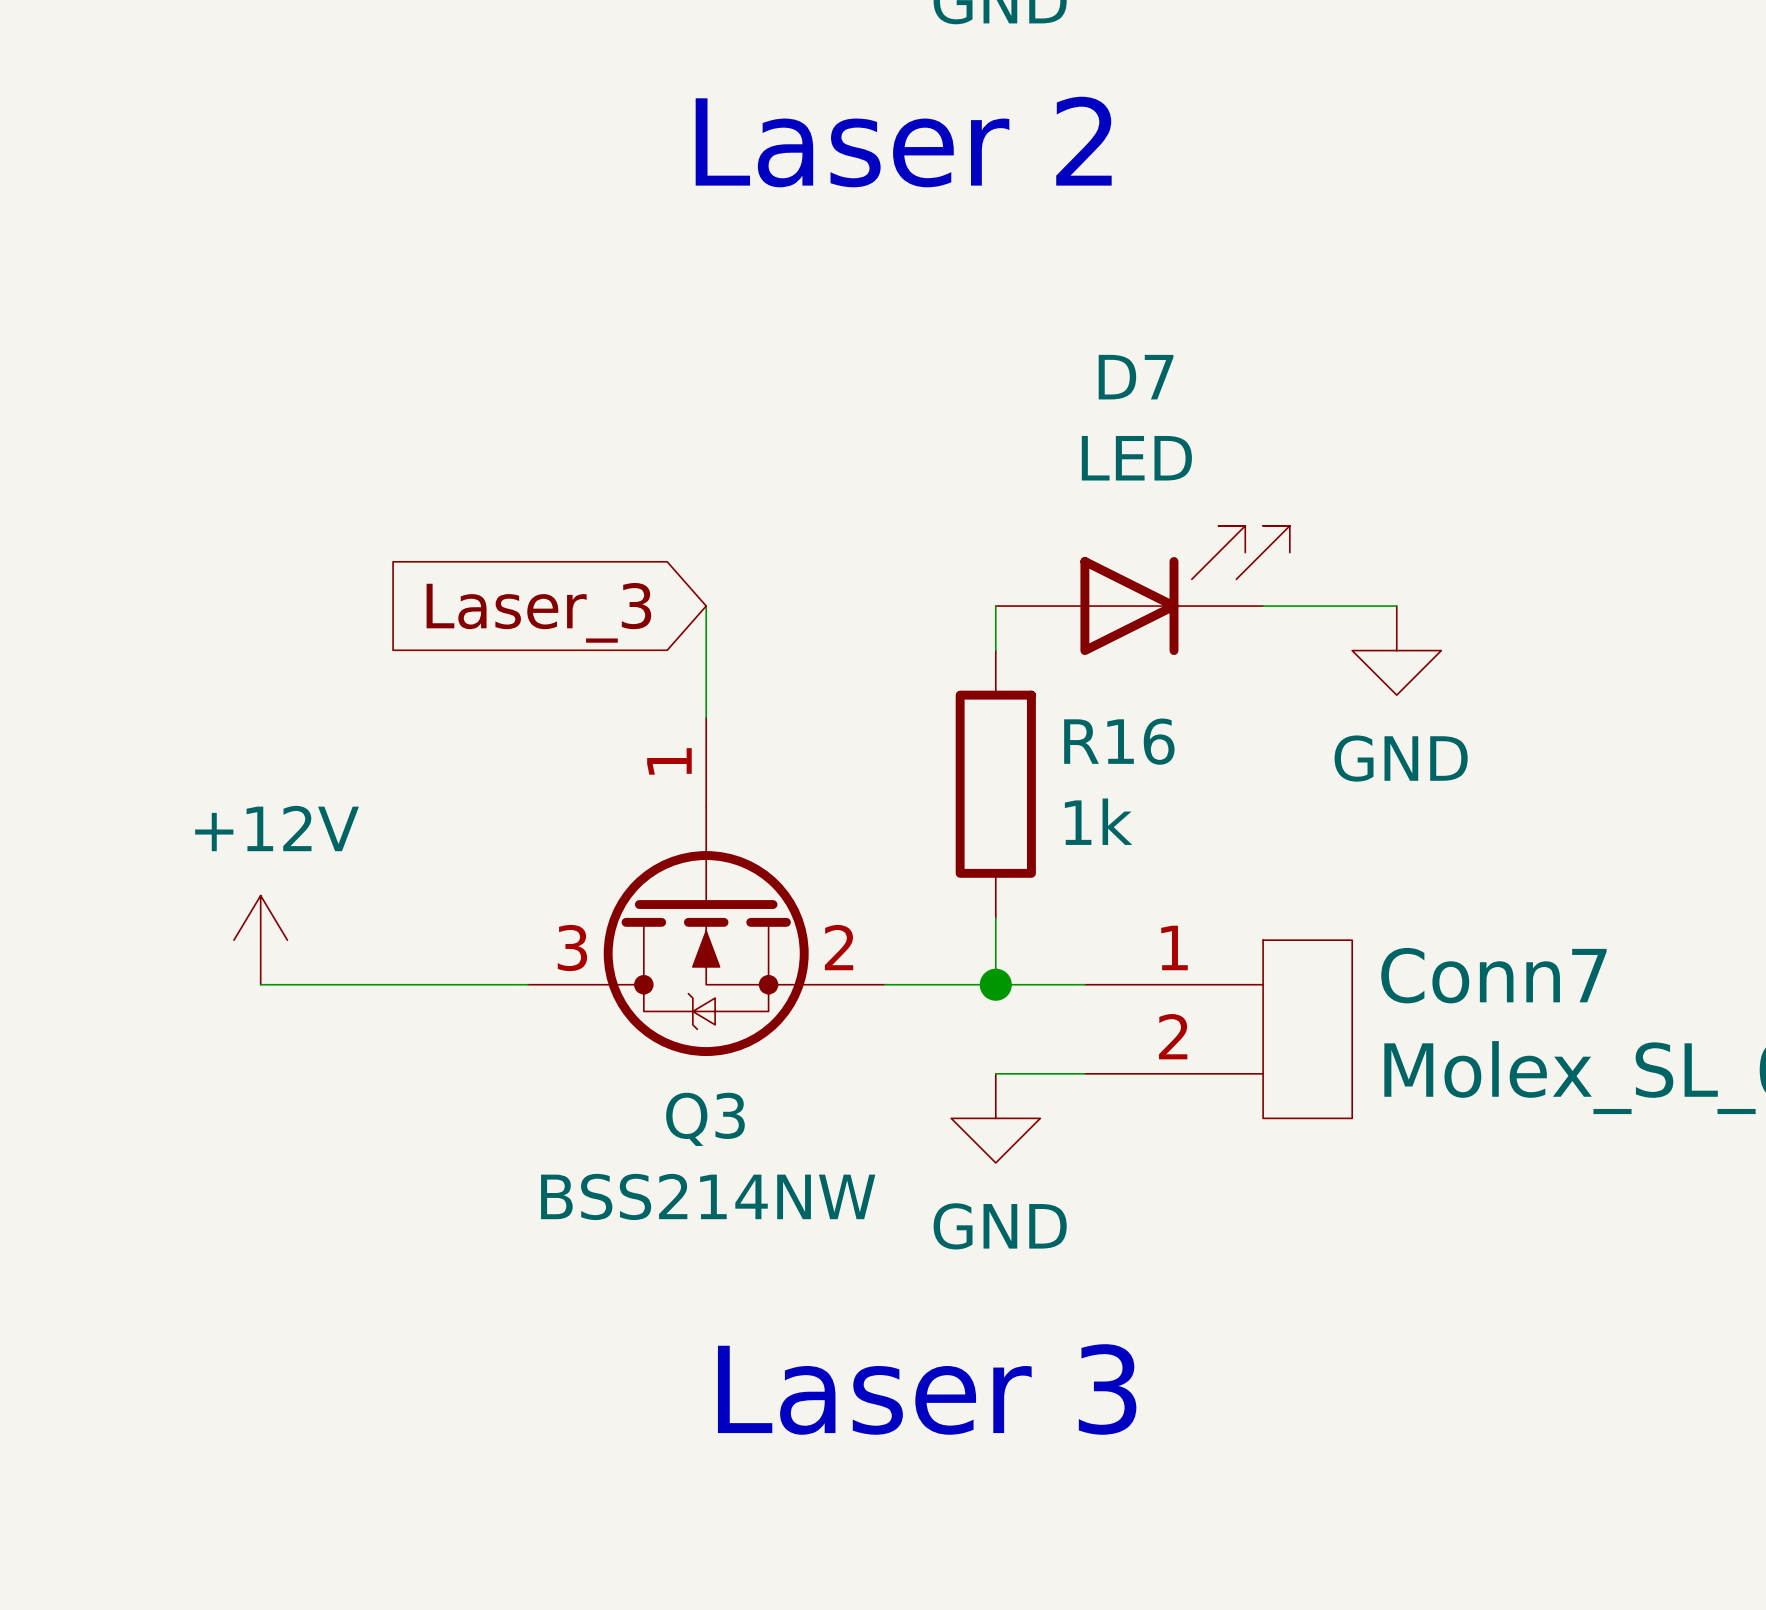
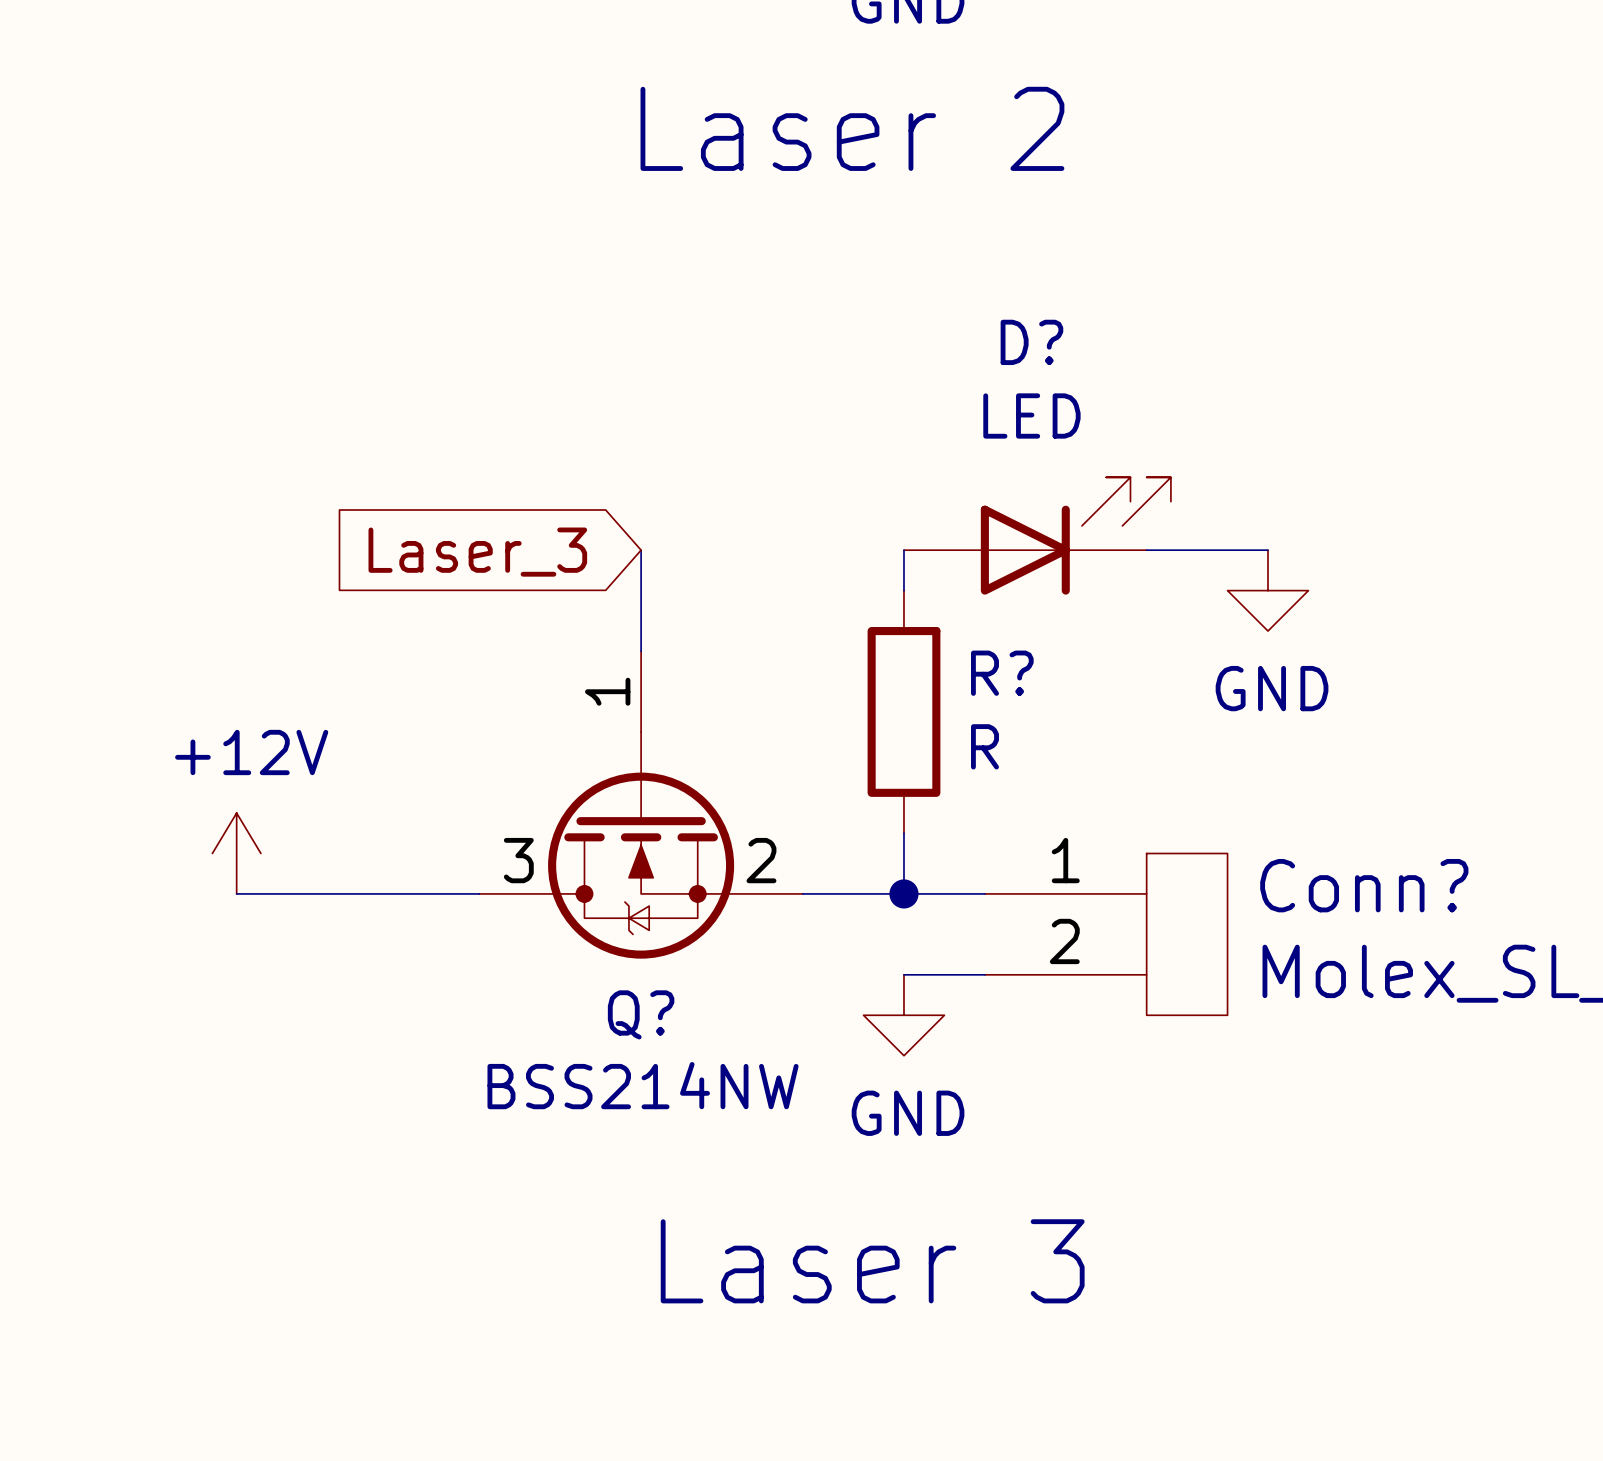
D7 name: D7 (1136, 377) -> D? (1031, 342)
R16 name: R16 (1119, 741) -> R? (1002, 673)
R16 value: 1k (1098, 821) -> R (984, 746)
Conn7 name: Conn7 (1493, 975) -> Conn? (1364, 885)
Q3 name: Q3 (705, 1119) -> Q? (641, 1014)

